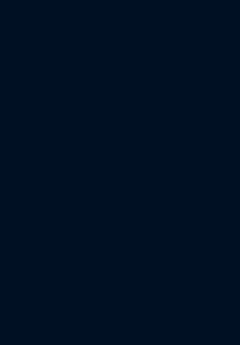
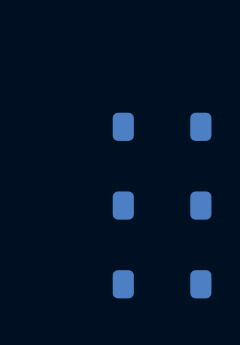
part: none -> (162, 126)
part: none -> (162, 205)
part: none -> (162, 284)

